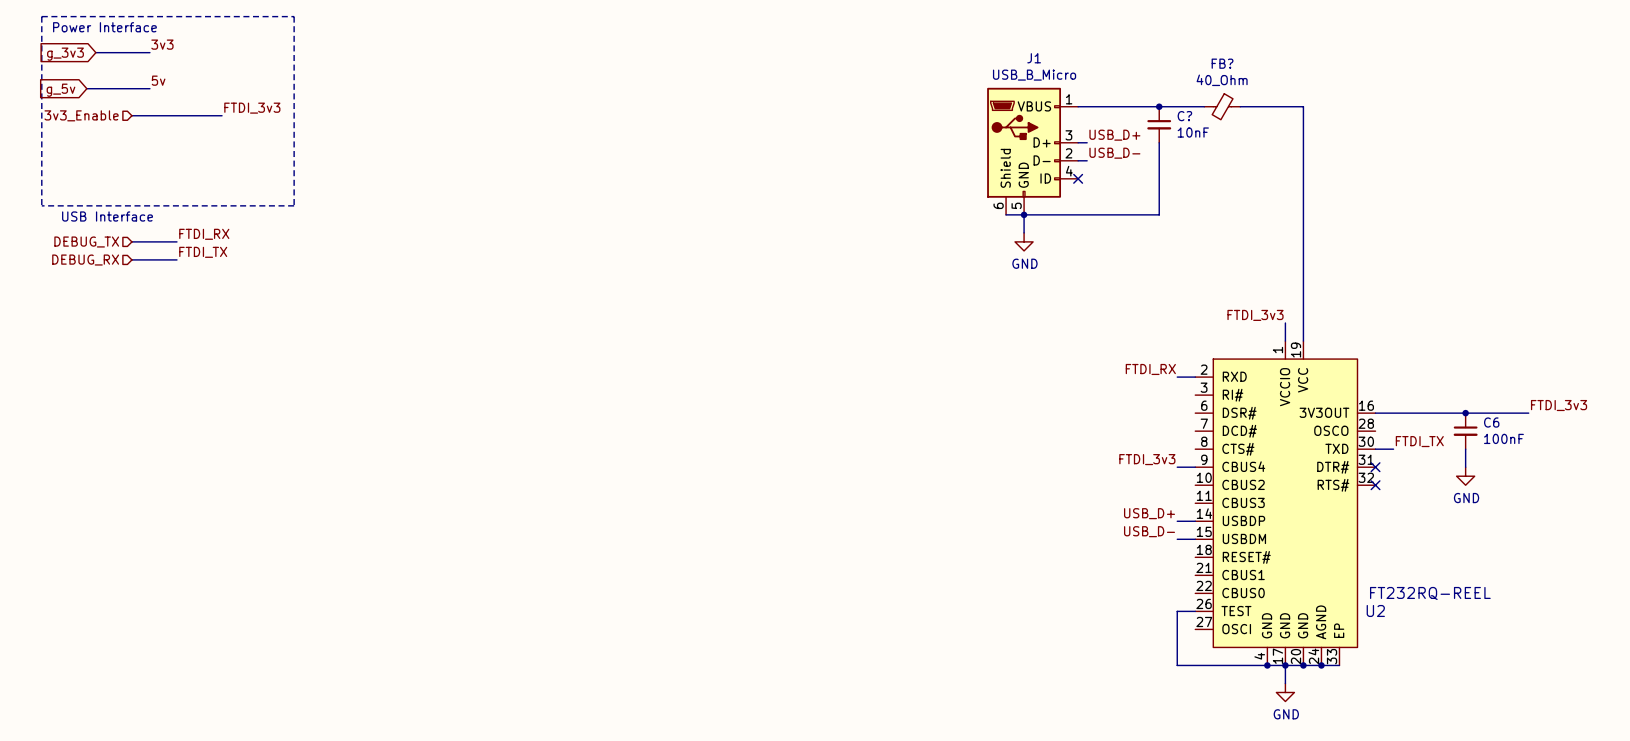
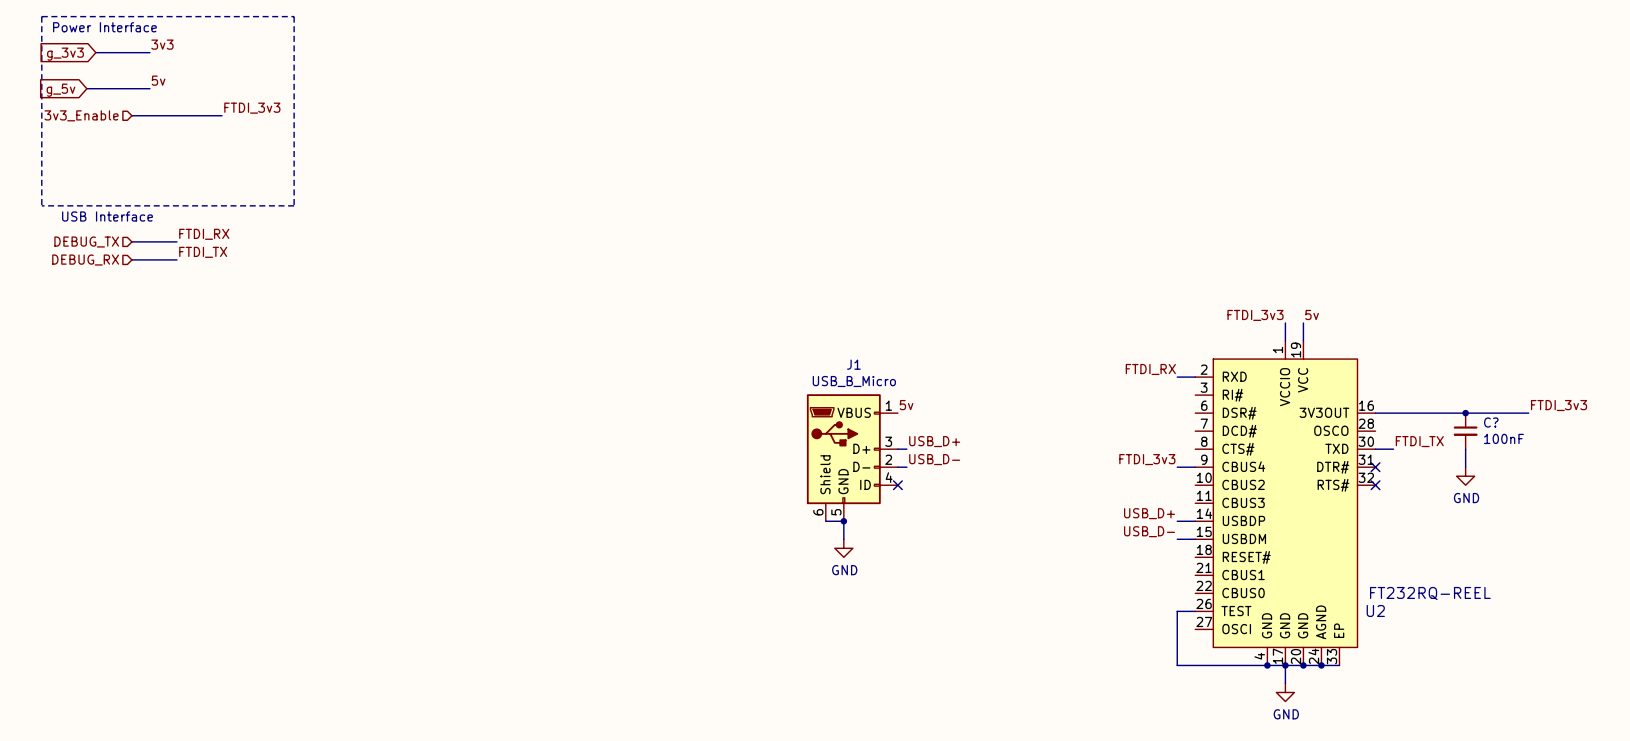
wire: (1078, 106) (1204, 106) -> none
junction: (1159, 106) -> none
FB?: 40_Ohm (1222, 106) -> none
wire: (1240, 106) (1303, 106) (1303, 323) -> none
C?: 10nF (1159, 124) -> none
label: USB_D+ (1114, 135) -> none
wire: (1078, 142) (1087, 142) -> none
wire: (1159, 142) (1159, 214) (1006, 214) -> none
J1 position: (1032, 151) -> (852, 457)
label: USB_D- (1114, 153) -> none
wire: (1078, 160) (1087, 160) -> none
no-connect mark: (1078, 178) -> none
wire: (1024, 214) (1024, 232) -> none
junction: (1024, 214) -> none
power symbol: GND (1024, 241) -> none
label: none -> 5v (1312, 314)
label: none -> 5v (906, 405)
C6 name: C6 (1491, 422) -> C? (1491, 422)
label: none -> USB_D+ (934, 441)
wire: none -> (897, 449) (906, 449)
label: none -> USB_D- (934, 459)
wire: none -> (897, 467) (906, 467)
no-connect mark: none -> (897, 485)
wire: none -> (825, 521) (843, 521) (843, 539)
junction: none -> (843, 521)
power symbol: none -> GND (843, 548)

